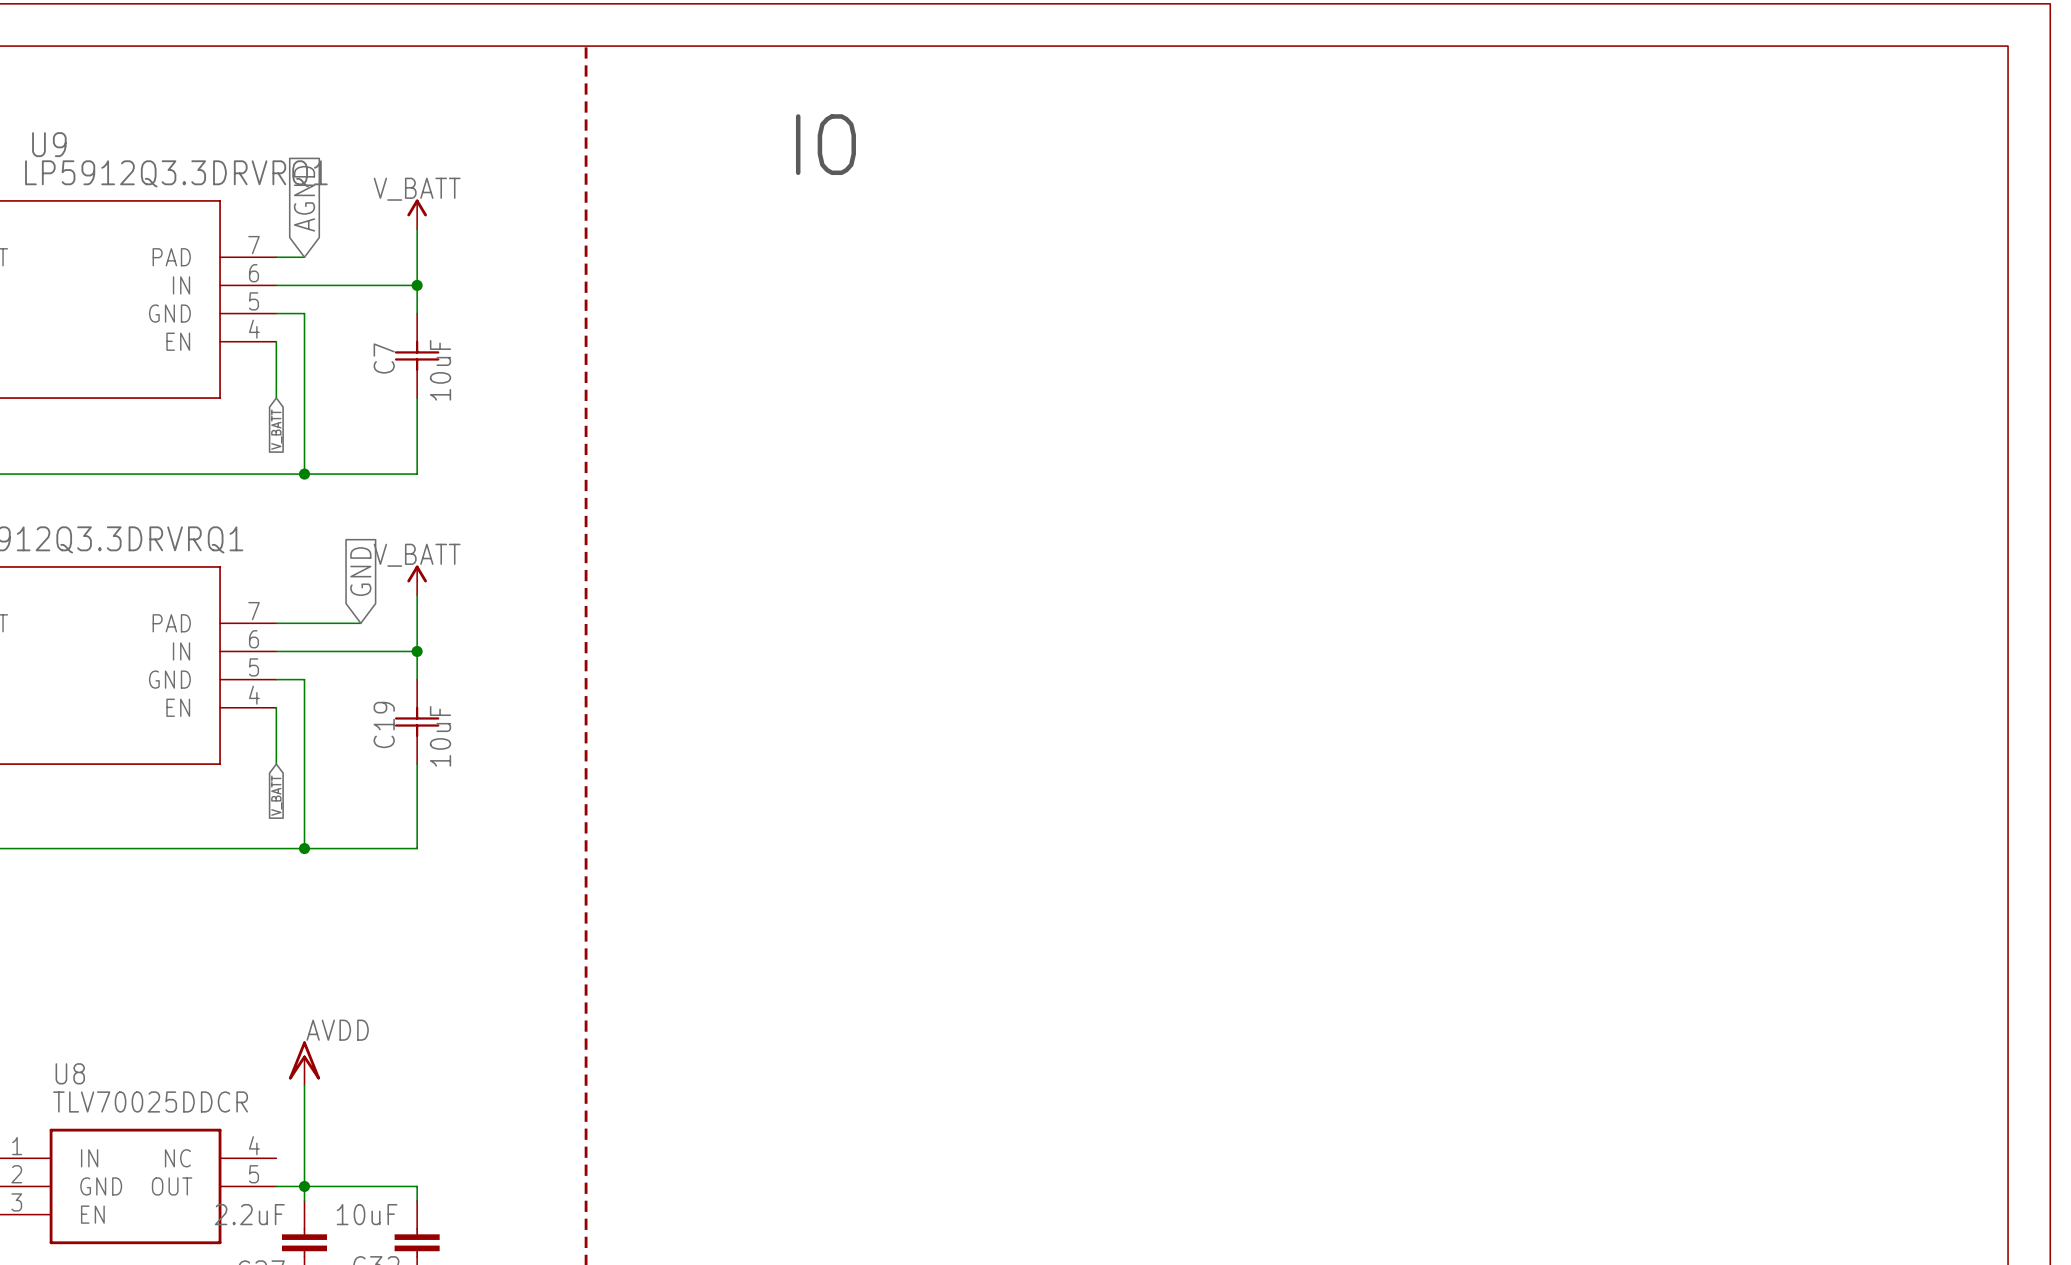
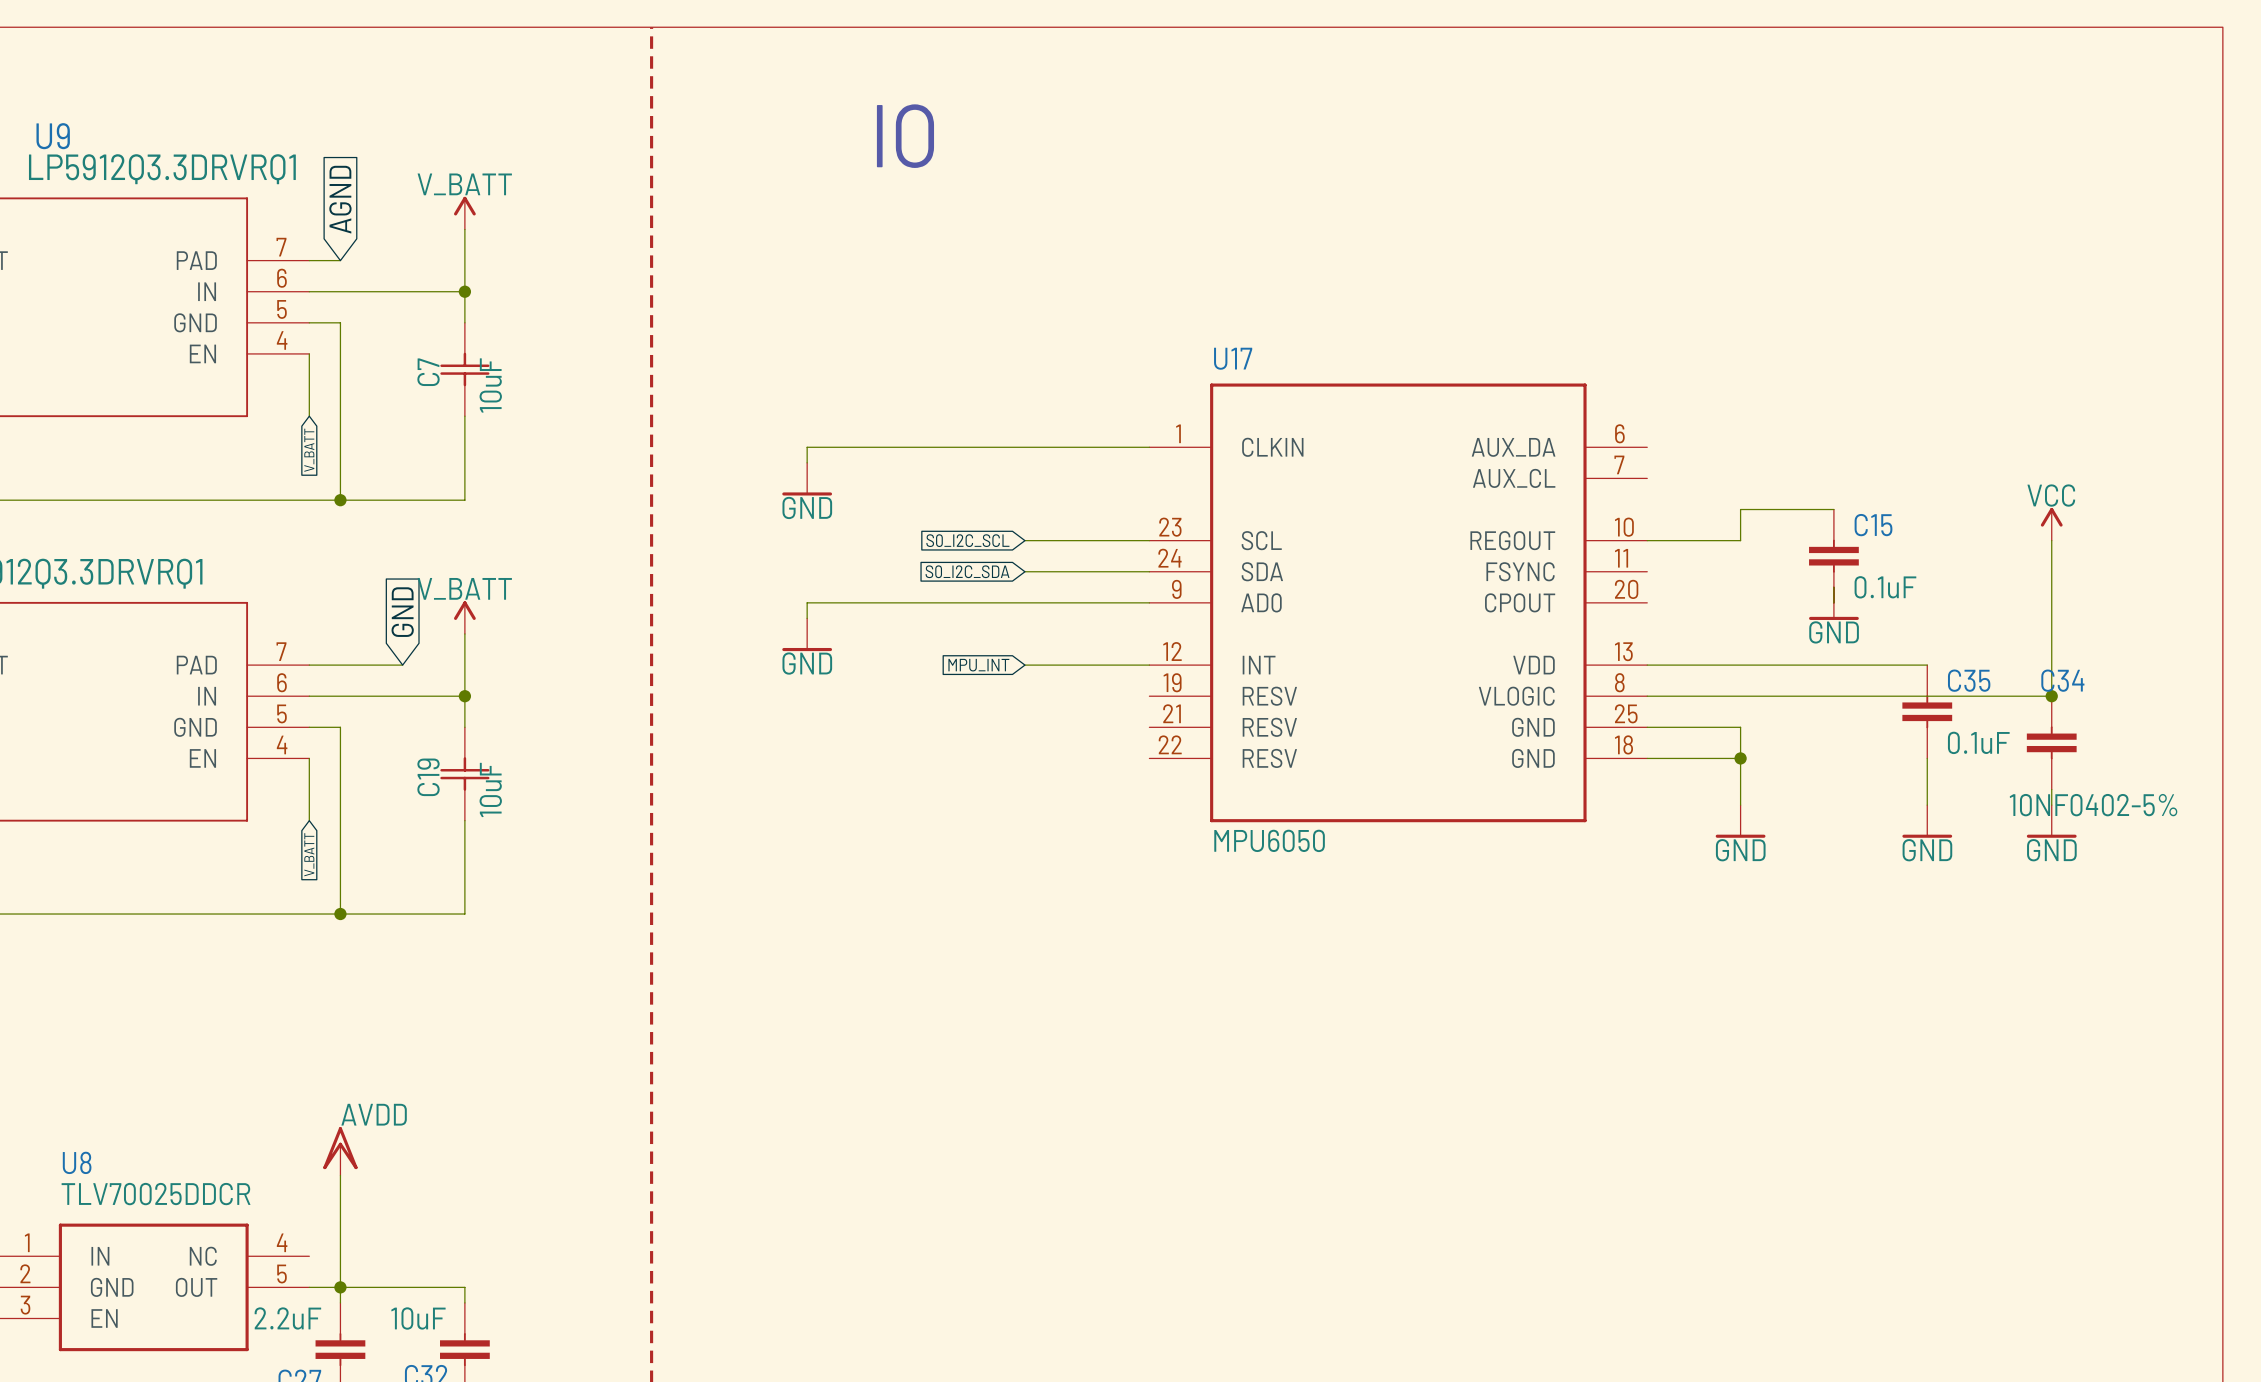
wire: none -> (1149, 447) (807, 447) (807, 462)
power symbol: none -> GND (807, 479)
wire: none -> (1833, 509) (1740, 509) (1740, 540) (1647, 540)
power symbol: none -> VCC (2051, 524)
wire: none -> (1024, 540) (1149, 540)
wire: none -> (2051, 540) (2051, 696) (1647, 696)
global label: none -> S0_I2C_SCL (967, 540)
C15: none -> 0.1uF (1833, 556)
wire: none -> (1024, 571) (1149, 571)
global label: none -> S0_I2C_SDA (967, 571)
wire: none -> (1833, 587) (1833, 602)
wire: none -> (1149, 602) (807, 602) (807, 618)
U17: none -> MPU6050 (1398, 602)
power symbol: none -> GND (1833, 603)
power symbol: none -> GND (807, 634)
global label: none -> MPU_INT (978, 665)
wire: none -> (1024, 665) (1149, 665)
wire: none -> (1647, 665) (1927, 665)
junction: none -> (2051, 696)
C35: none -> 0.1uF (1927, 711)
wire: none -> (1647, 727) (1740, 727) (1740, 805)
C34: none -> 10NF0402-5% (2051, 742)
wire: none -> (1647, 758) (1740, 758)
junction: none -> (1740, 758)
wire: none -> (1927, 758) (1927, 805)
wire: none -> (2051, 789) (2051, 805)
power symbol: none -> GND (1740, 821)
power symbol: none -> GND (1927, 821)
power symbol: none -> GND (2051, 821)

